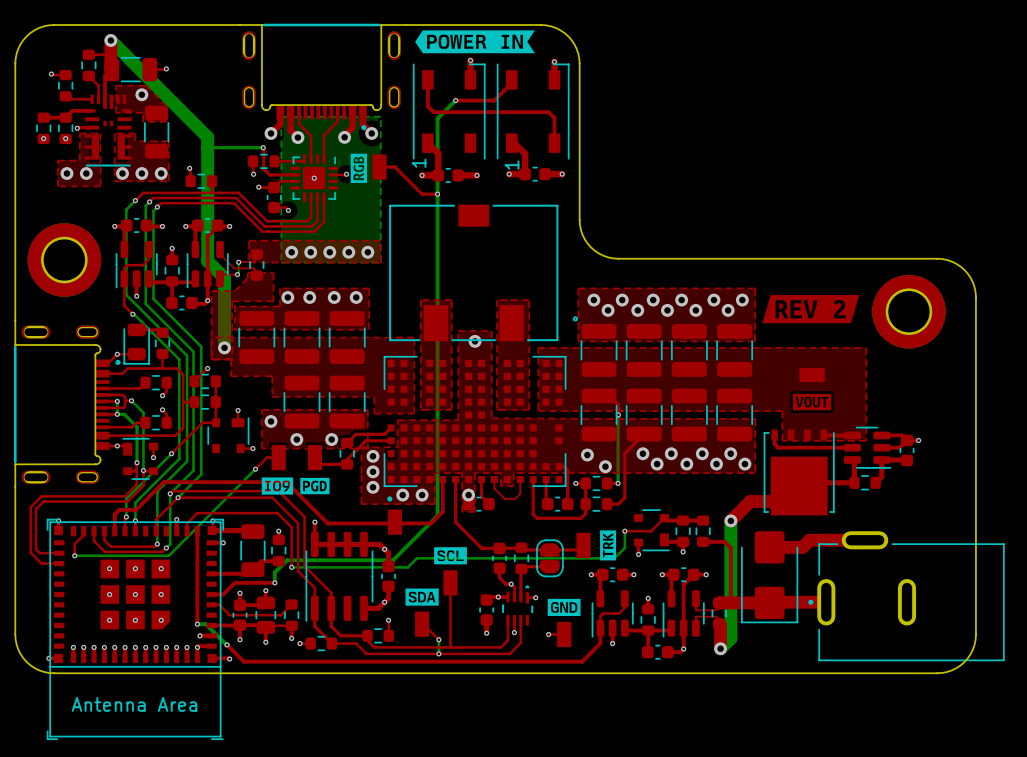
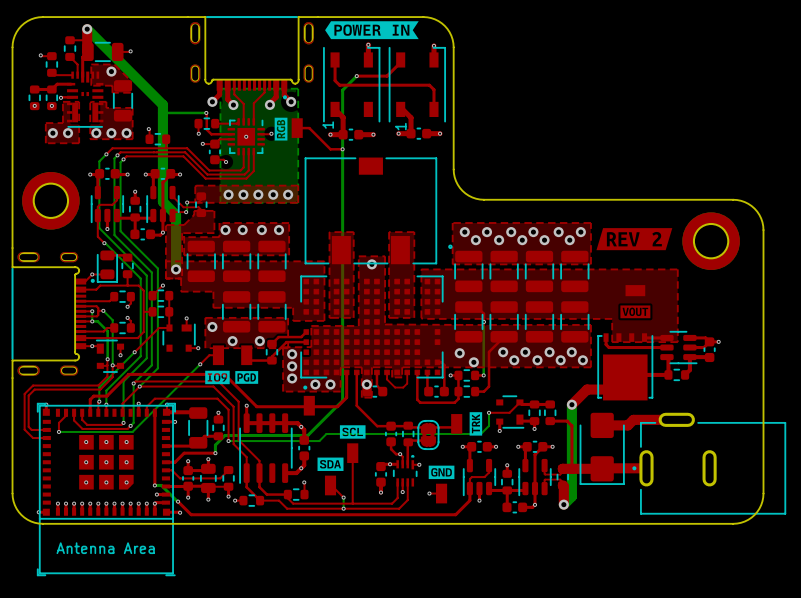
part footprint: [536, 539, 564, 578] -> [417, 420, 440, 450]

